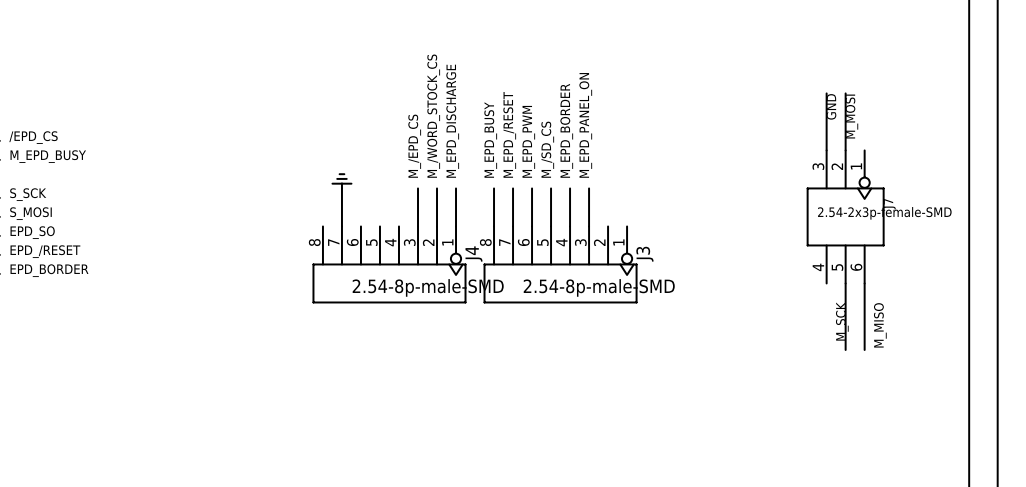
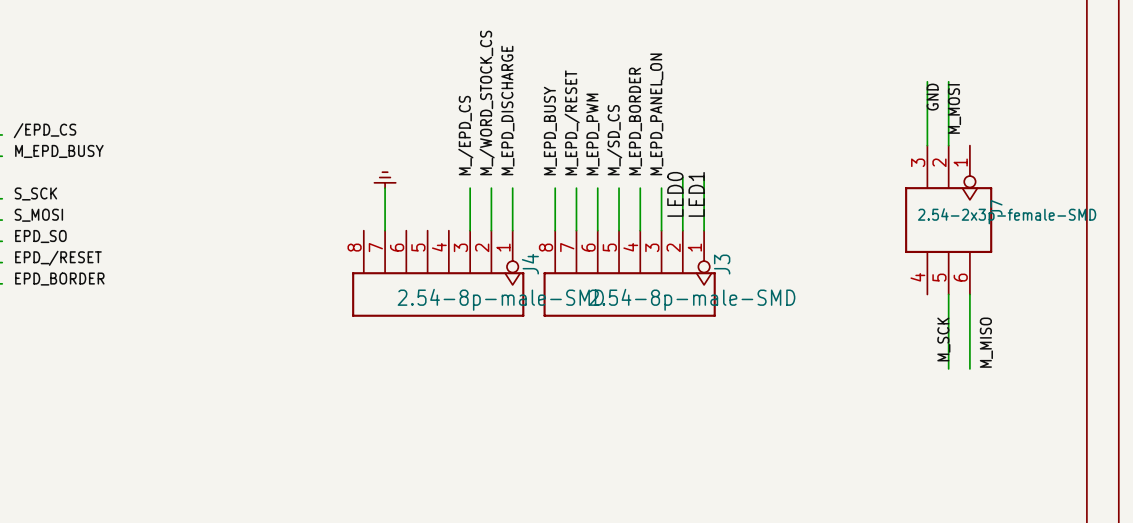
wire: none -> (682, 177) (682, 230)
wire: none -> (704, 177) (704, 230)
label: none -> LED0 (675, 194)
label: none -> LED1 (696, 194)

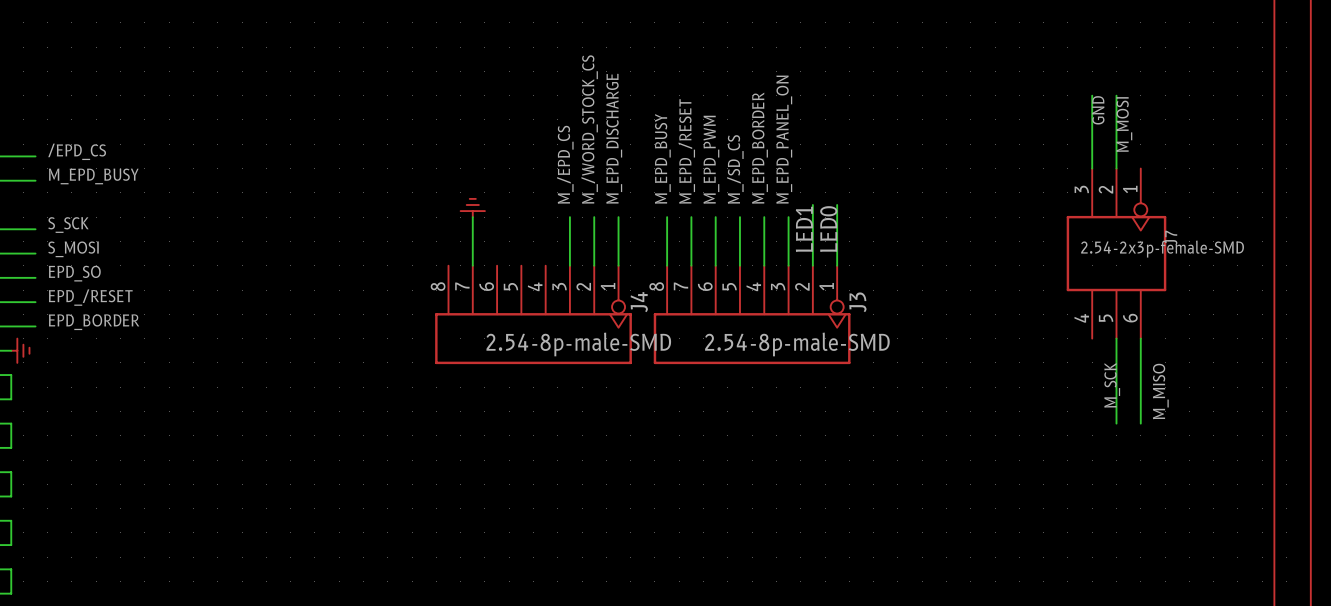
label: LED0 (675, 194) -> LED1 (804, 229)
label: LED1 (696, 194) -> LED0 (828, 229)

